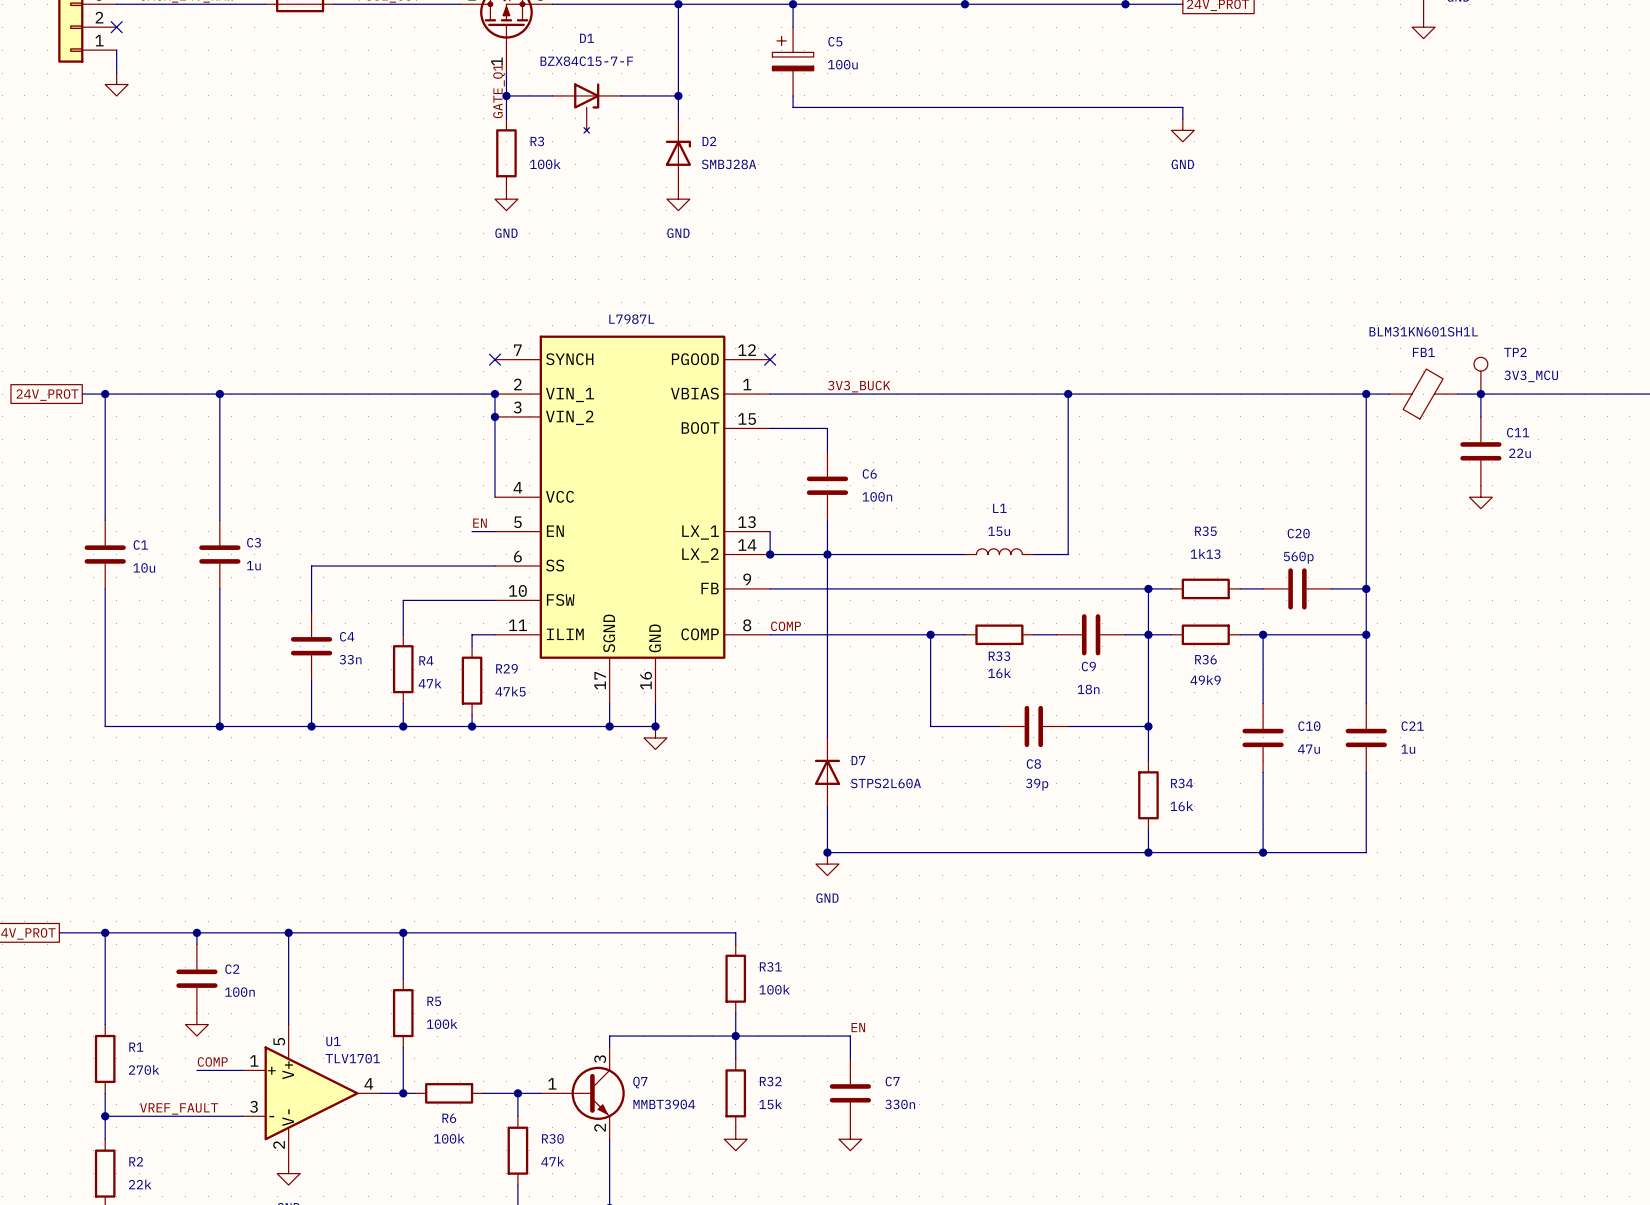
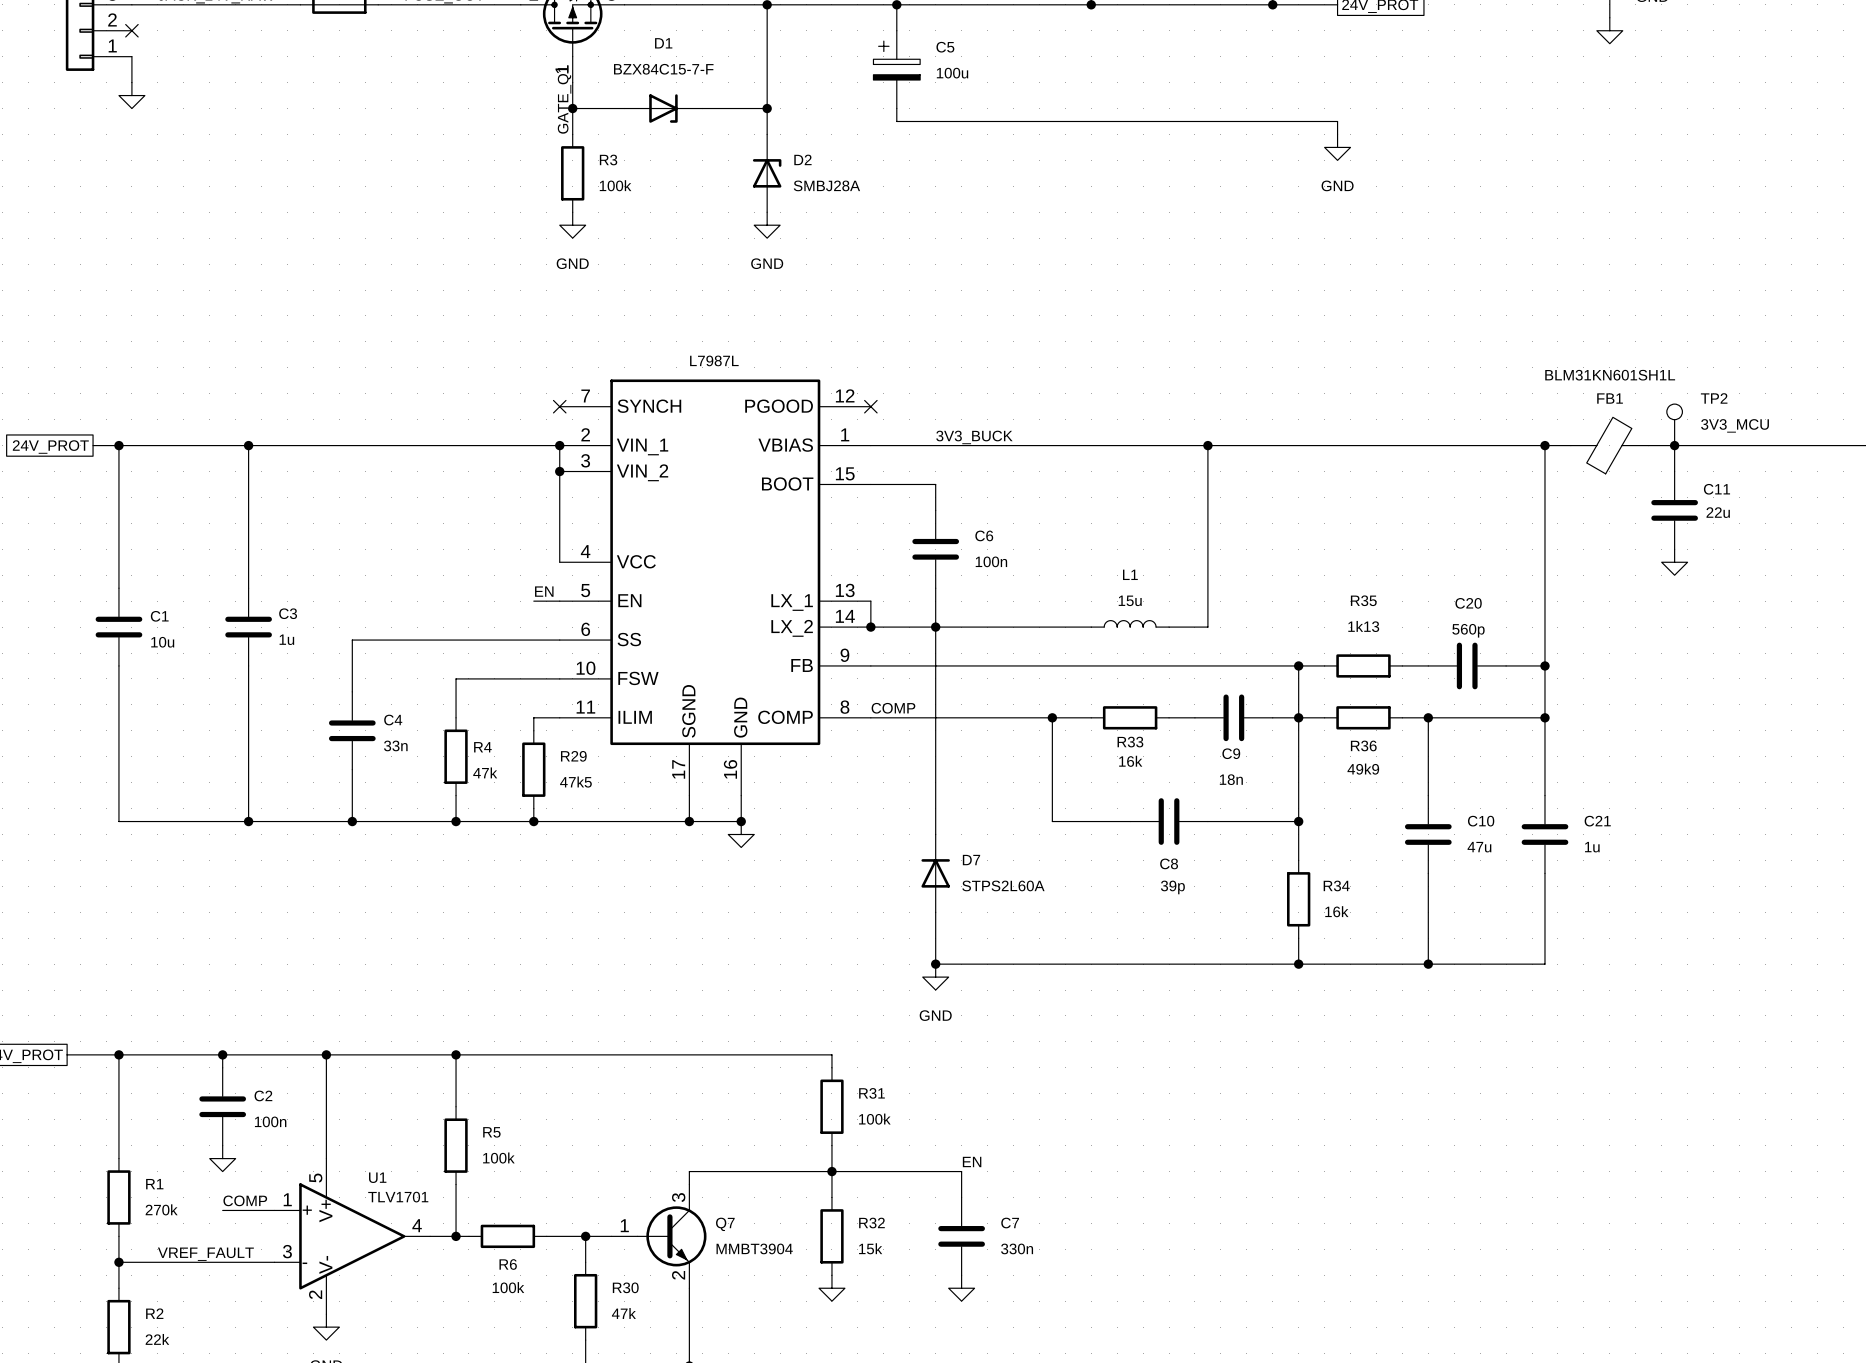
D1 symbol: [552, 83, 622, 134] -> [624, 94, 703, 123]

